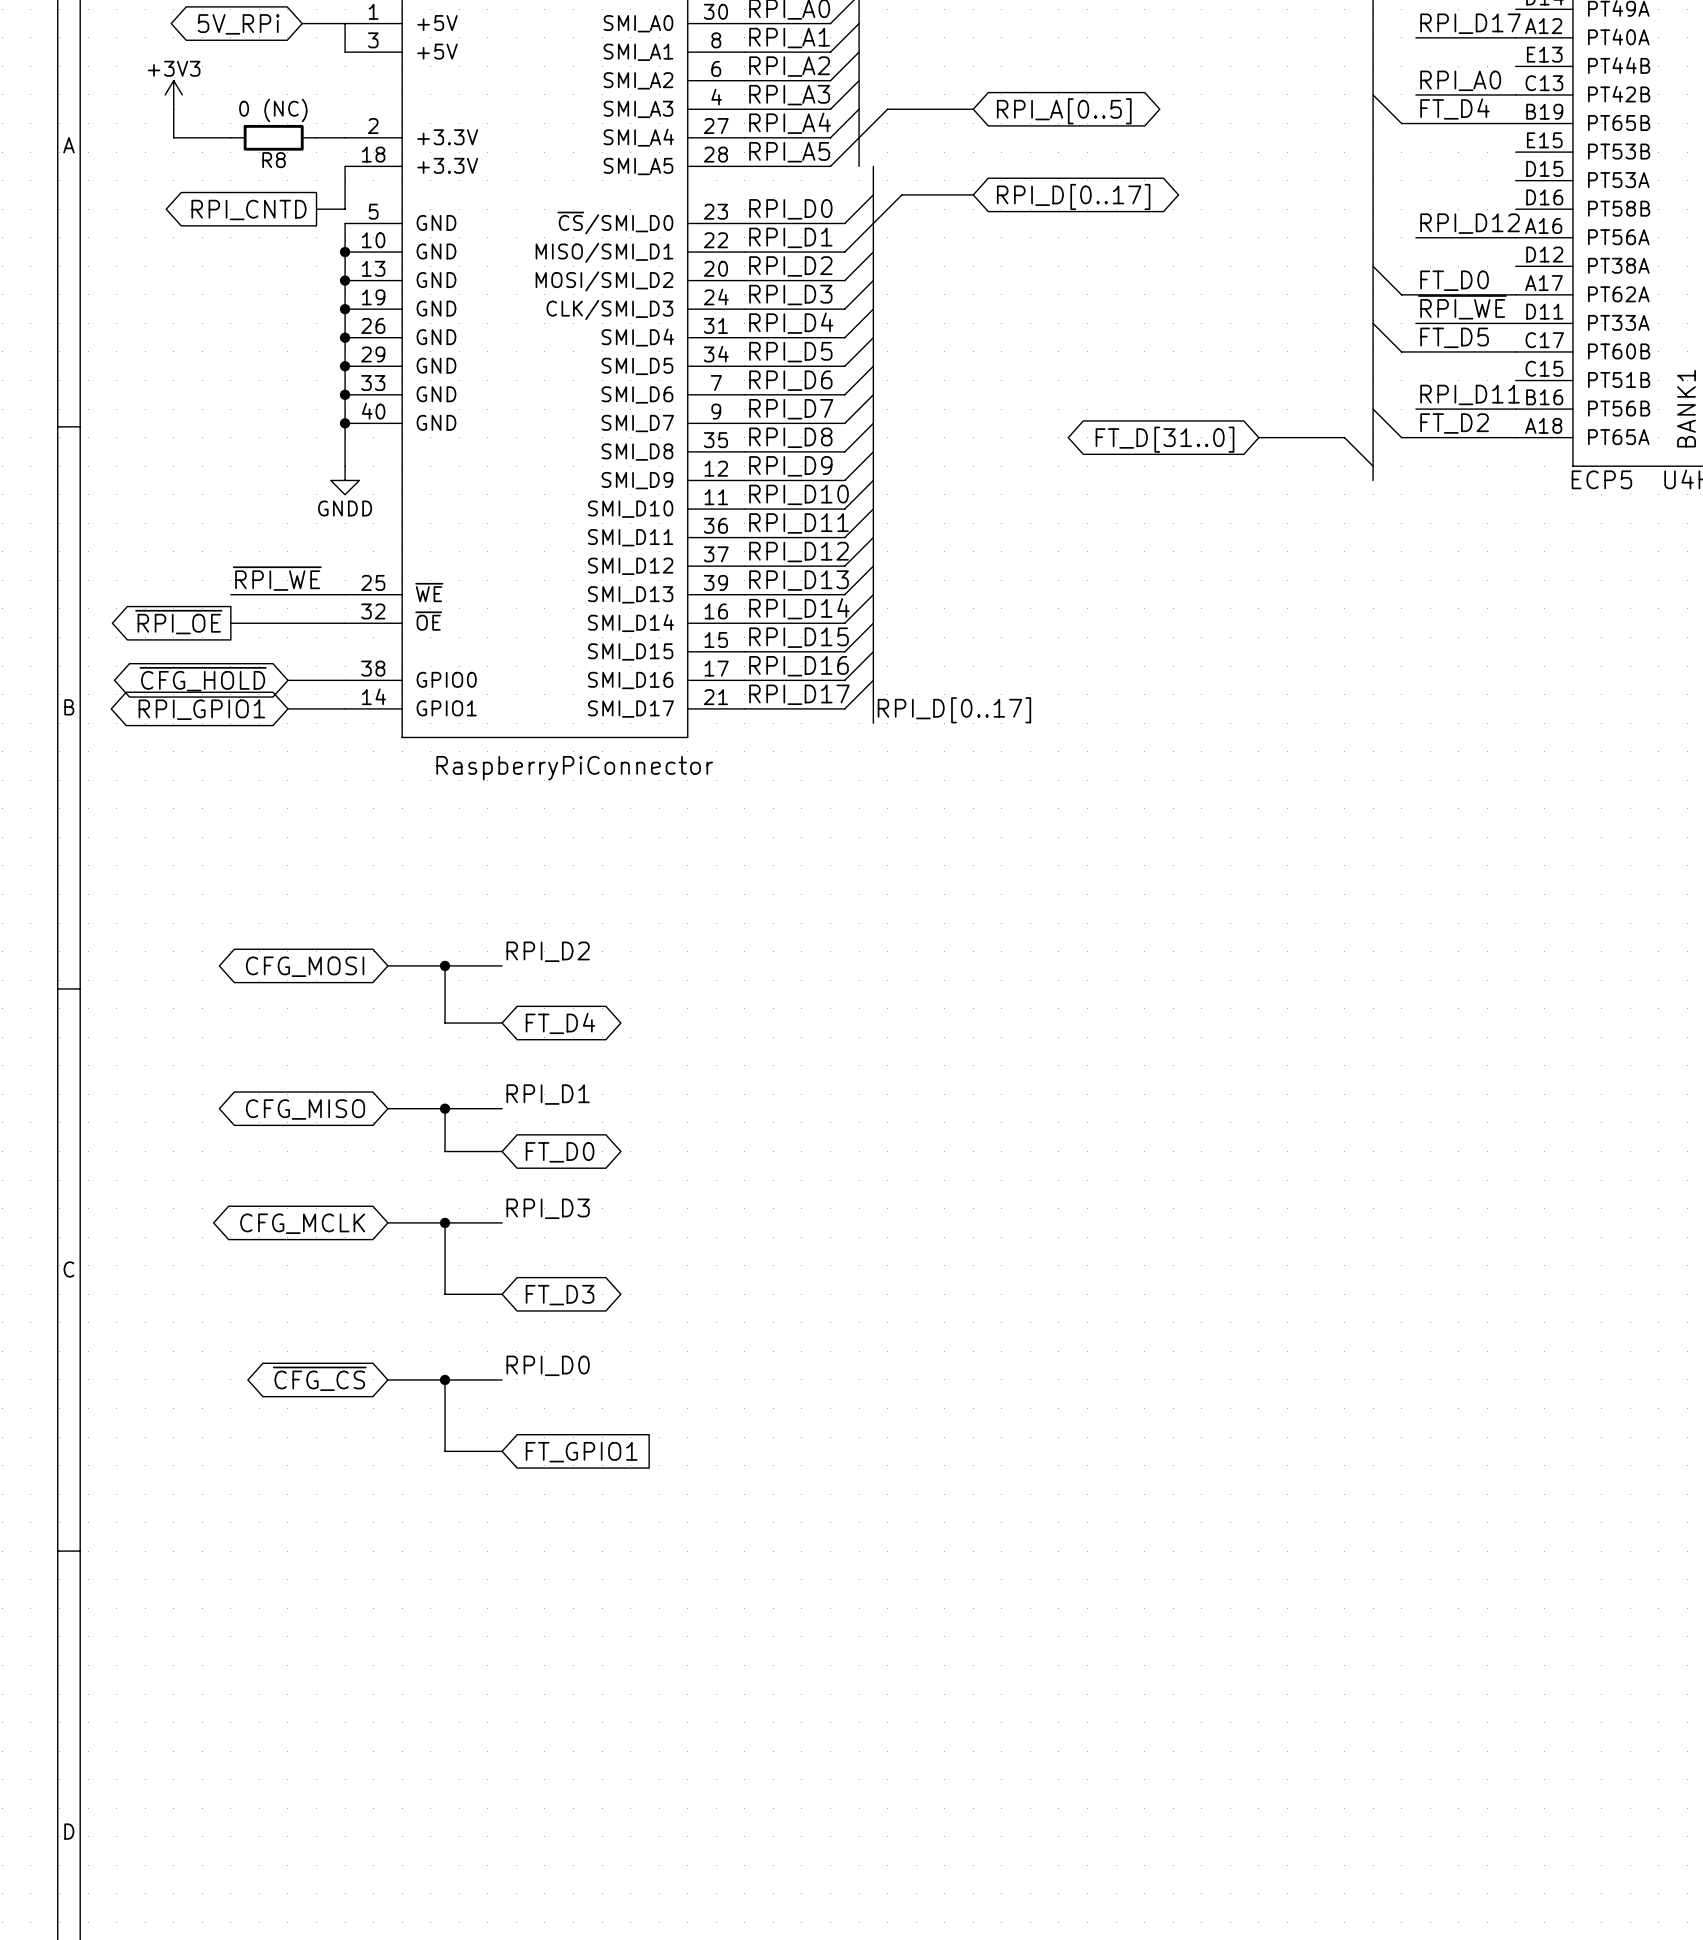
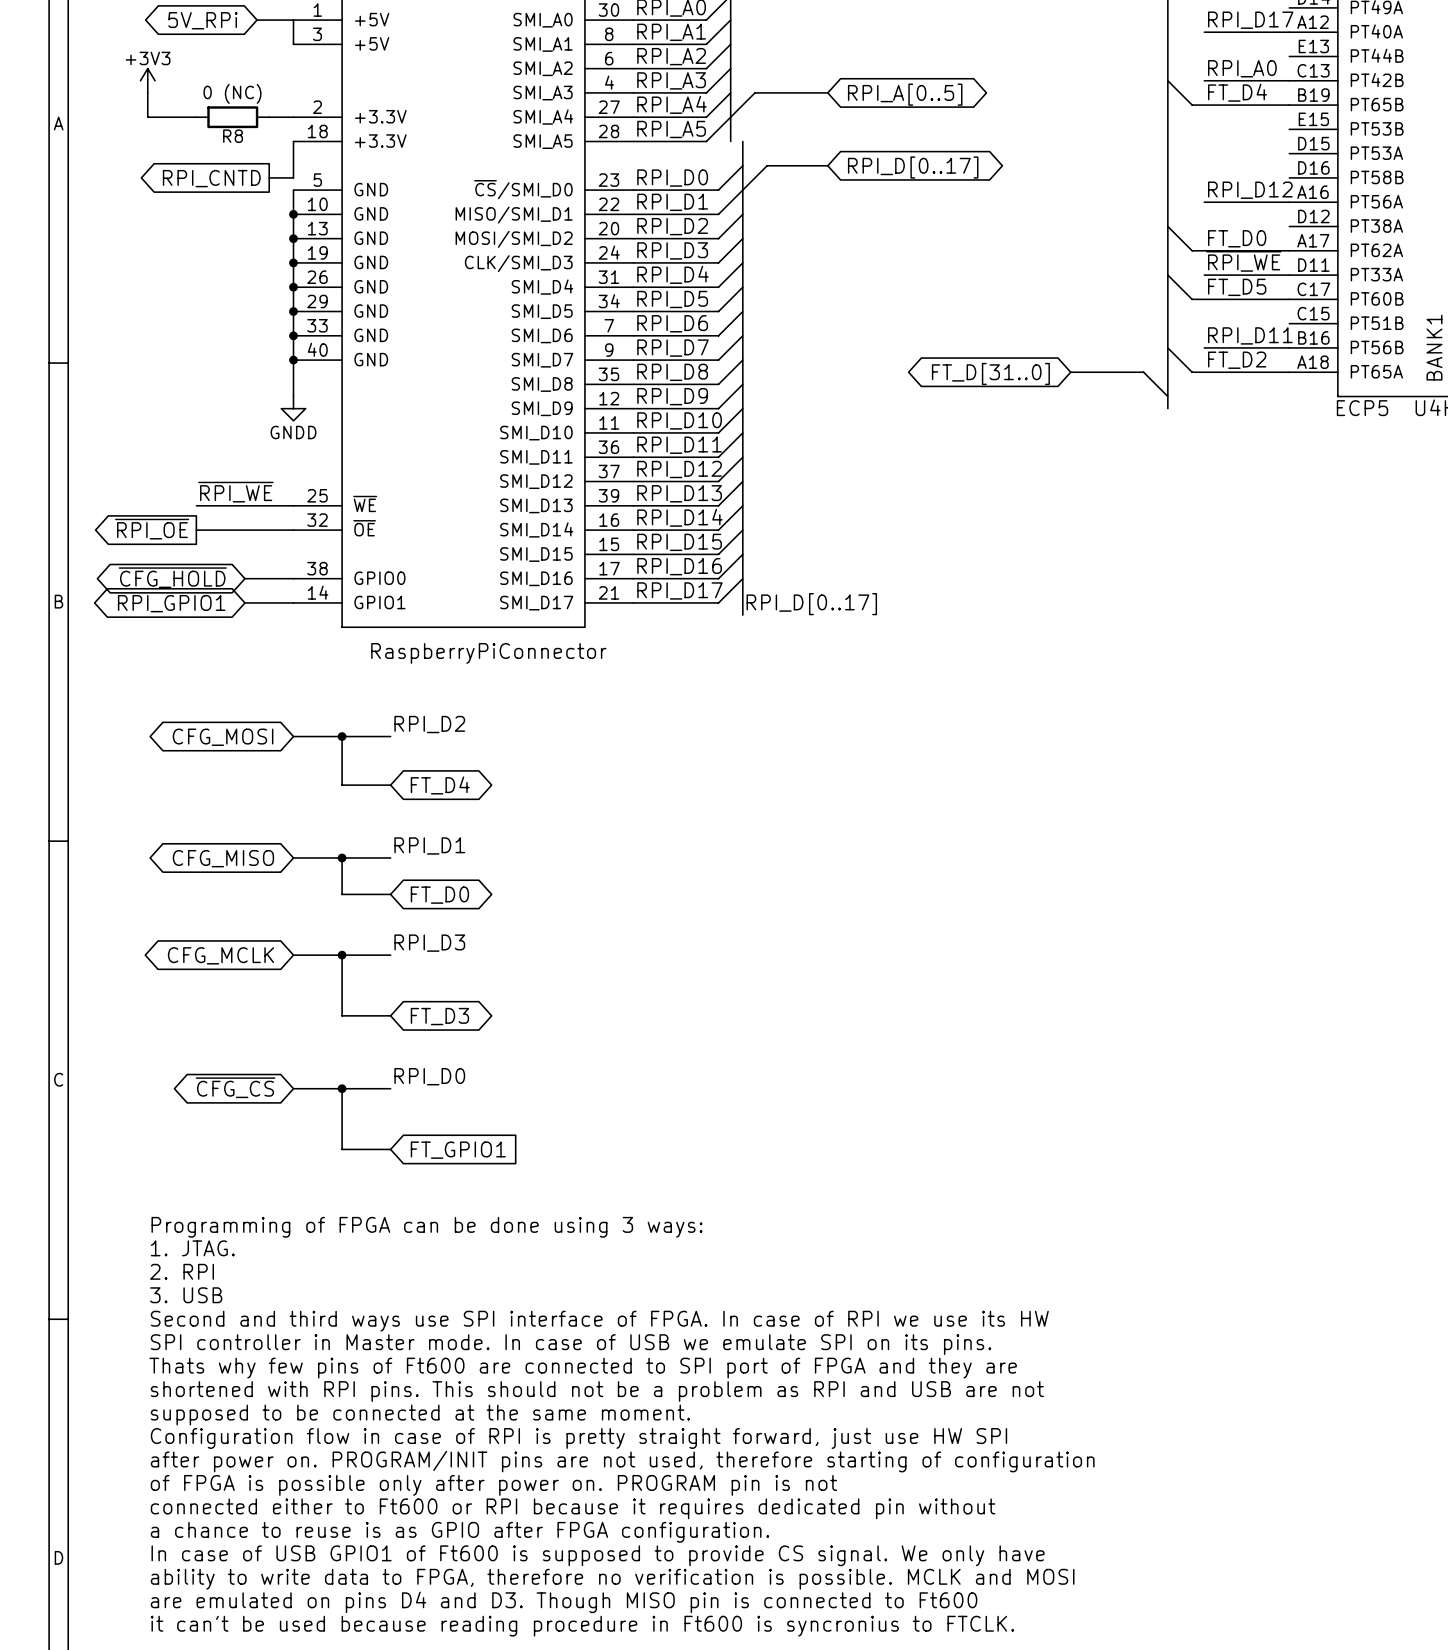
junction: none -> (342, 736)
label position: RPI_D2 (548, 951) -> RPI_D2 (429, 724)
wire: (387, 965) (502, 965) -> (293, 736) (390, 736)
wire: (445, 965) (445, 1023) (502, 1023) -> (342, 736) (342, 785) (390, 785)
junction: (445, 965) -> none
global label position: CFG_MOSI (305, 966) -> CFG_MOSI (223, 737)
junction: none -> (342, 857)
global label position: FT_D4 (560, 1023) -> FT_D4 (440, 785)
label position: RPI_D1 (548, 1094) -> RPI_D1 (429, 845)
wire: (387, 1108) (502, 1108) -> (293, 857) (390, 857)
wire: (445, 1108) (445, 1151) (502, 1151) -> (342, 857) (342, 894) (390, 894)
junction position: (445, 1108) -> (342, 955)
global label position: CFG_MISO (305, 1109) -> CFG_MISO (223, 858)
global label position: FT_D0 (560, 1152) -> FT_D0 (439, 895)
label position: RPI_D3 (548, 1208) -> RPI_D3 (429, 943)
wire: (387, 1222) (502, 1222) -> (293, 955) (390, 955)
wire: (445, 1222) (445, 1294) (502, 1294) -> (342, 955) (342, 1015) (390, 1015)
junction: (445, 1222) -> none
global label position: CFG_MCLK (302, 1223) -> CFG_MCLK (220, 955)
junction: none -> (342, 1088)
global label position: FT_D3 (560, 1295) -> FT_D3 (439, 1016)
label position: RPI_D0 (548, 1365) -> RPI_D0 (429, 1076)
global label position: ~{CFG_CS} (319, 1378) -> ~{CFG_CS} (235, 1087)
wire: (387, 1379) (502, 1379) -> (293, 1088) (390, 1088)
wire: (445, 1379) (445, 1451) (502, 1451) -> (342, 1088) (342, 1149) (390, 1149)
junction: (445, 1379) -> none
text: none -> Programming of FPGA can be done using 3 ways: (427, 1227)
global label position: FT_GPIO1 (581, 1452) -> FT_GPIO1 (458, 1150)
text: none -> 1. JTAG. (192, 1248)
text: none -> 2. RPI (182, 1271)
text: none -> 3. USB (186, 1295)
text: none -> Second and third ways use SPI interface of FPGA. In case of RPI we use its HW (599, 1321)
text: none -> SPI controller in Master mode. In case of USB we emulate SPI on its pins. (570, 1344)
text: none -> Thats why few pins of Ft600 are connected to SPI port of FPGA and they are (583, 1368)
text: none -> shortened with RPI pins. This should not be a problem as RPI and USB are not (597, 1391)
text: none -> supposed to be connected at the same moment. (420, 1415)
text: none -> Configuration flow in case of RPI is pretty straight forward, just use HW SPI (578, 1438)
text: none -> after power on. PROGRAM/INIT pins are not used, therefore starting of configuration (622, 1461)
text: none -> of FPGA is possible only after power on. PROGRAM pin is not (493, 1485)
text: none -> connected either to Ft600 or RPI because it requires dedicated pin without (573, 1508)
text: none -> a chance to reuse is as GPIO after FPGA configuration. (459, 1532)
text: none -> In case of USB GPIO1 of Ft600 is supposed to provide CS signal. We only have (598, 1555)
text: none -> ability to write data to FPGA, therefore no verification is possible. MCLK and MOSI (612, 1579)
text: none -> are emulated on pins D4 and D3. Though MISO pin is connected to Ft600 (564, 1602)
text: none -> it can't be used because reading procedure in Ft600 is syncronius to FTCLK. (582, 1626)

